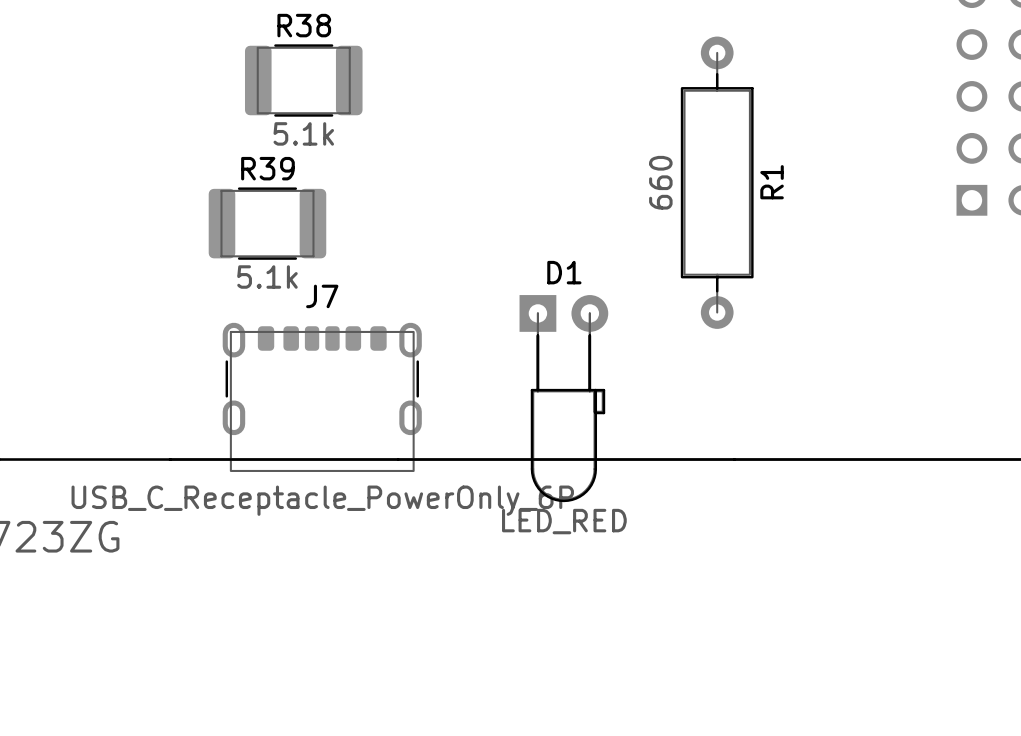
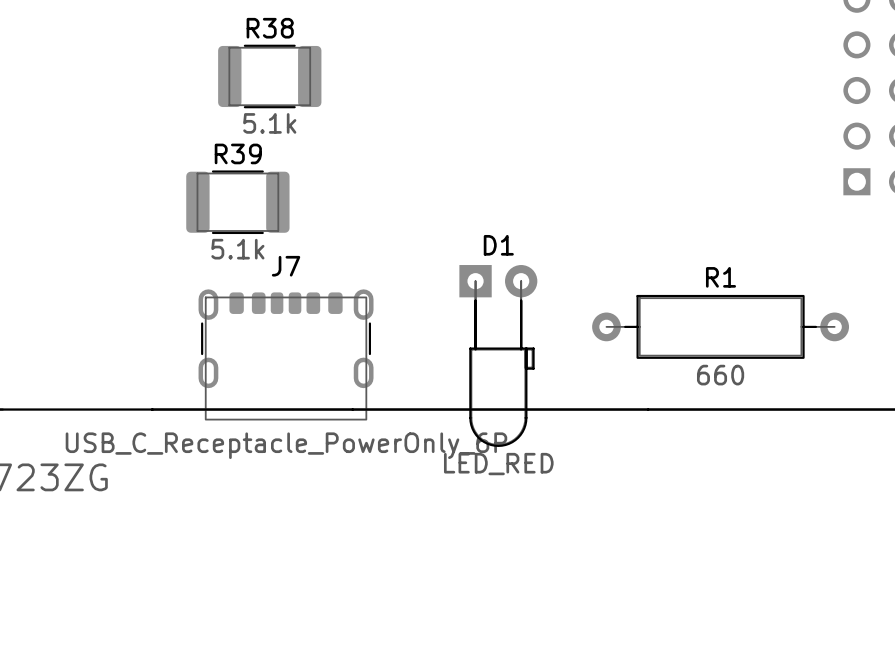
R1 value position: 660 (660, 182) -> 660 (720, 375)
R1 rotation: 0° (717, 182) -> 90° clockwise (720, 326)
R1 position: (717, 182) -> (720, 326)
R1 name position: R1 (772, 182) -> R1 (721, 277)

